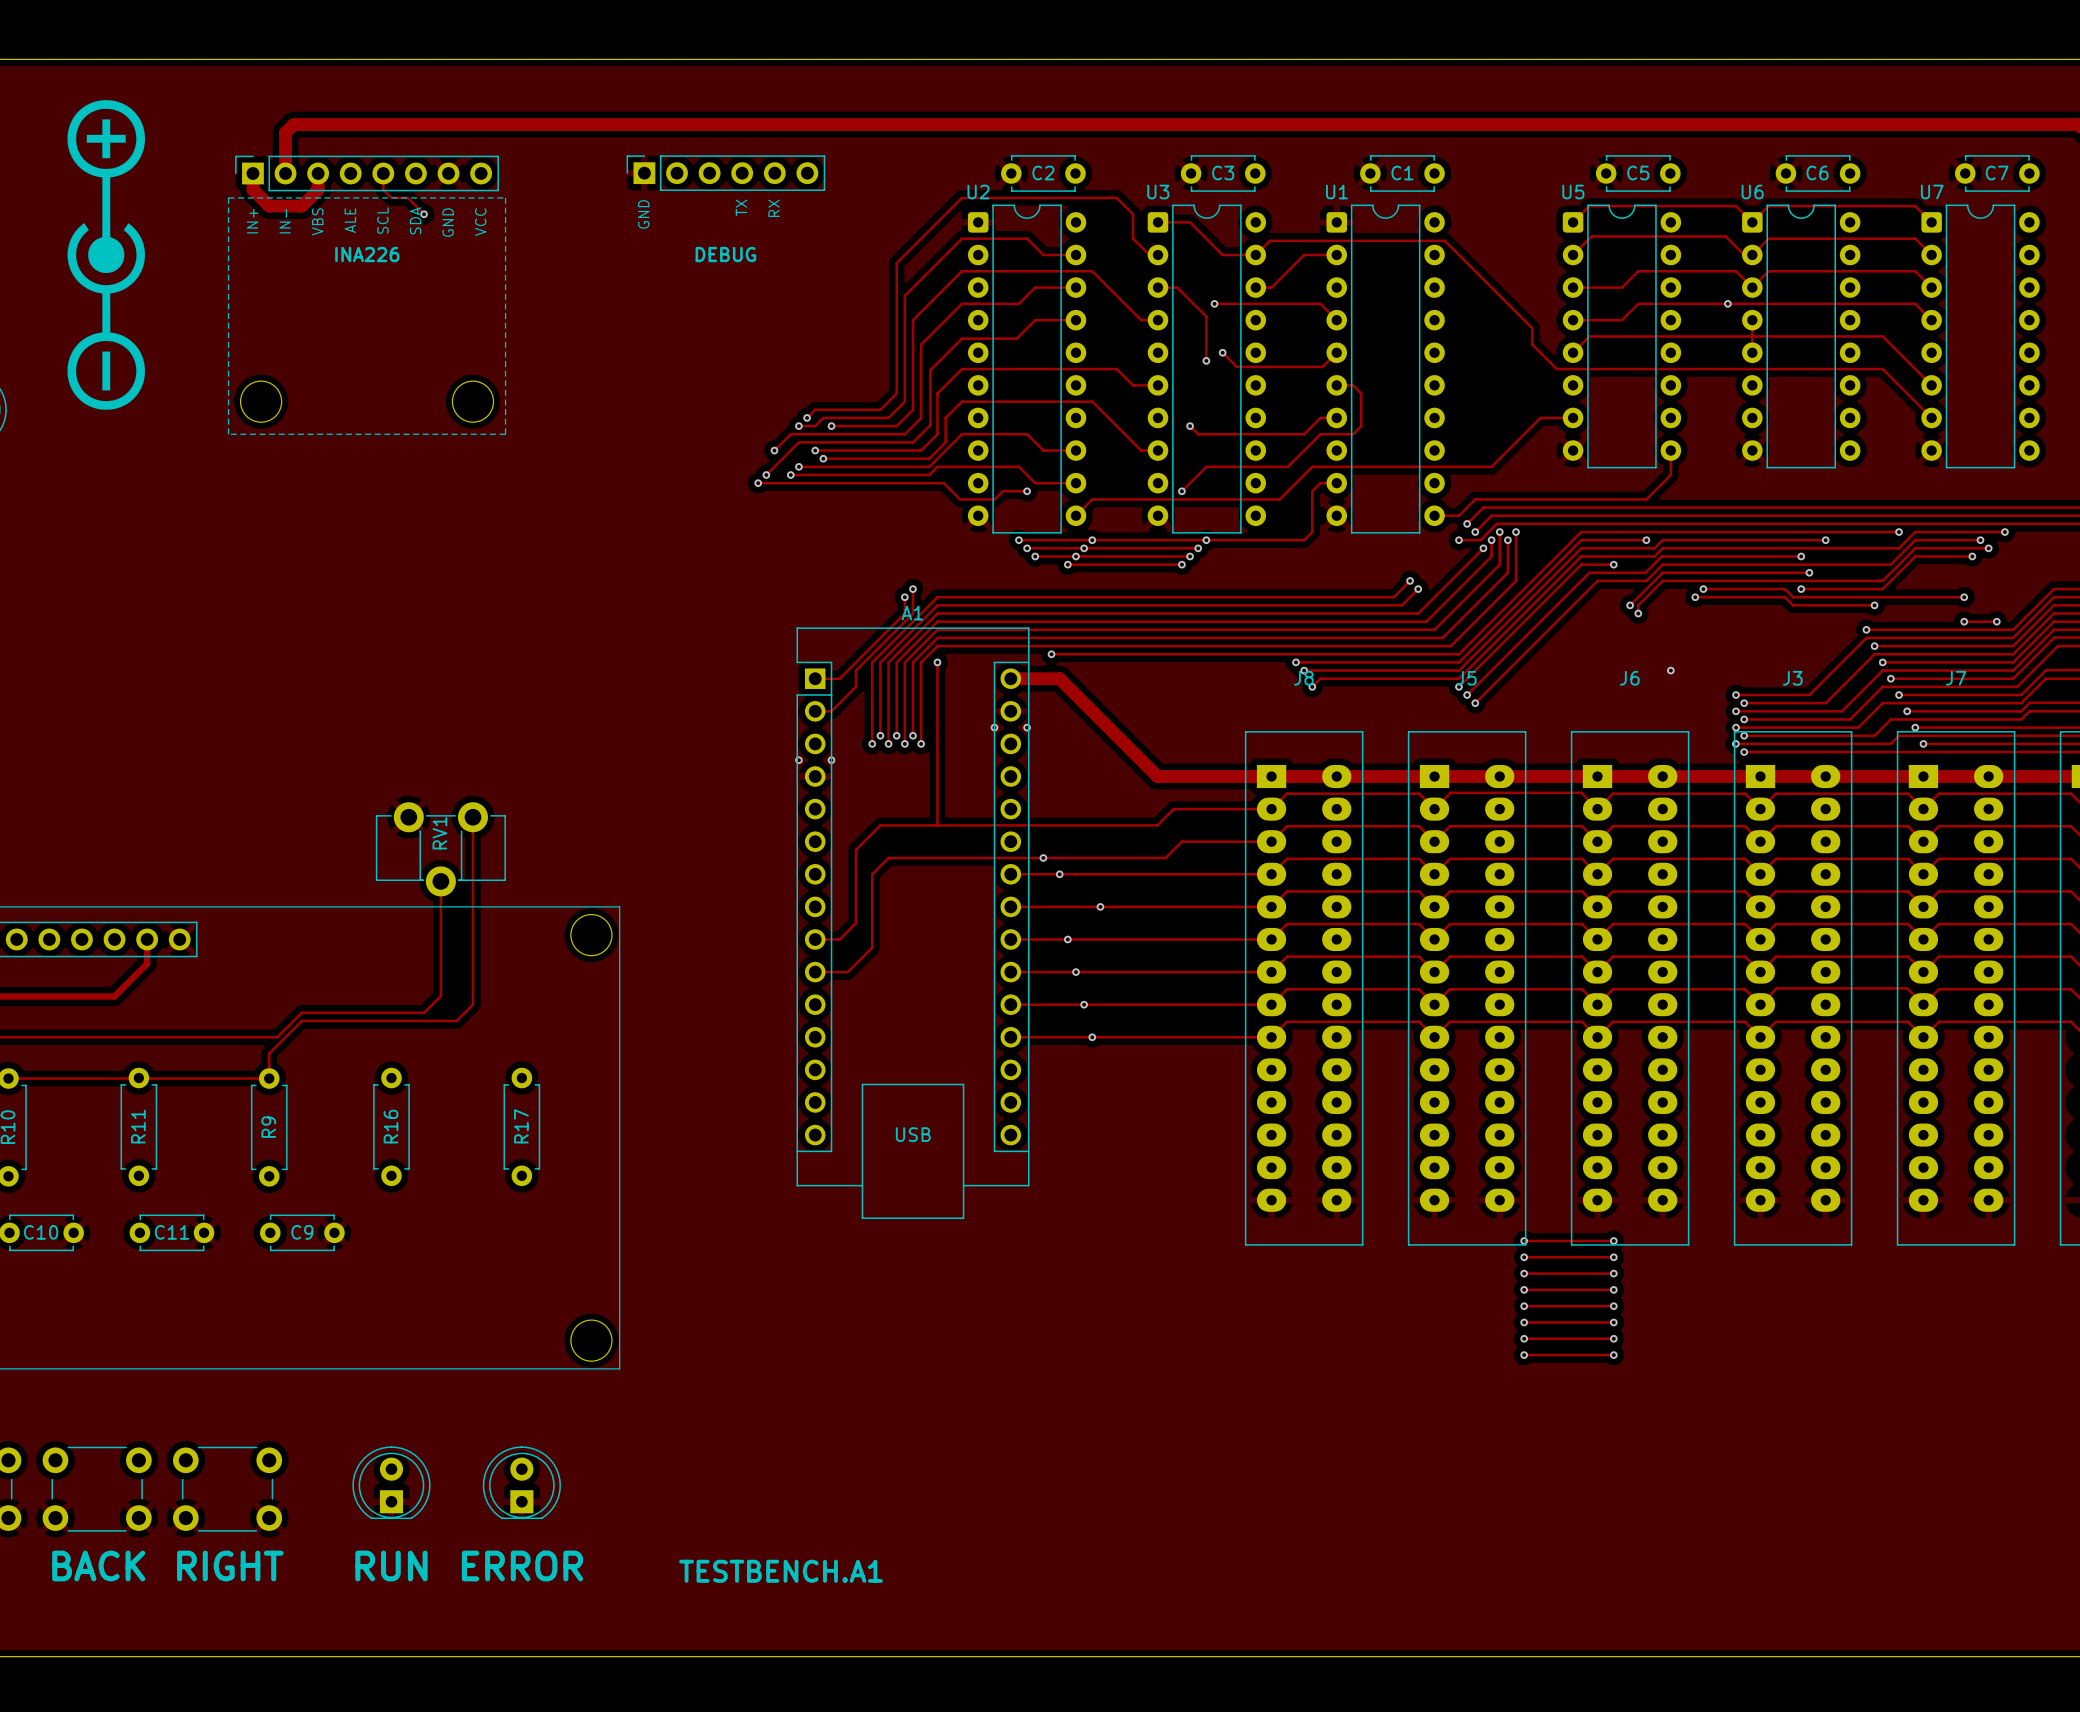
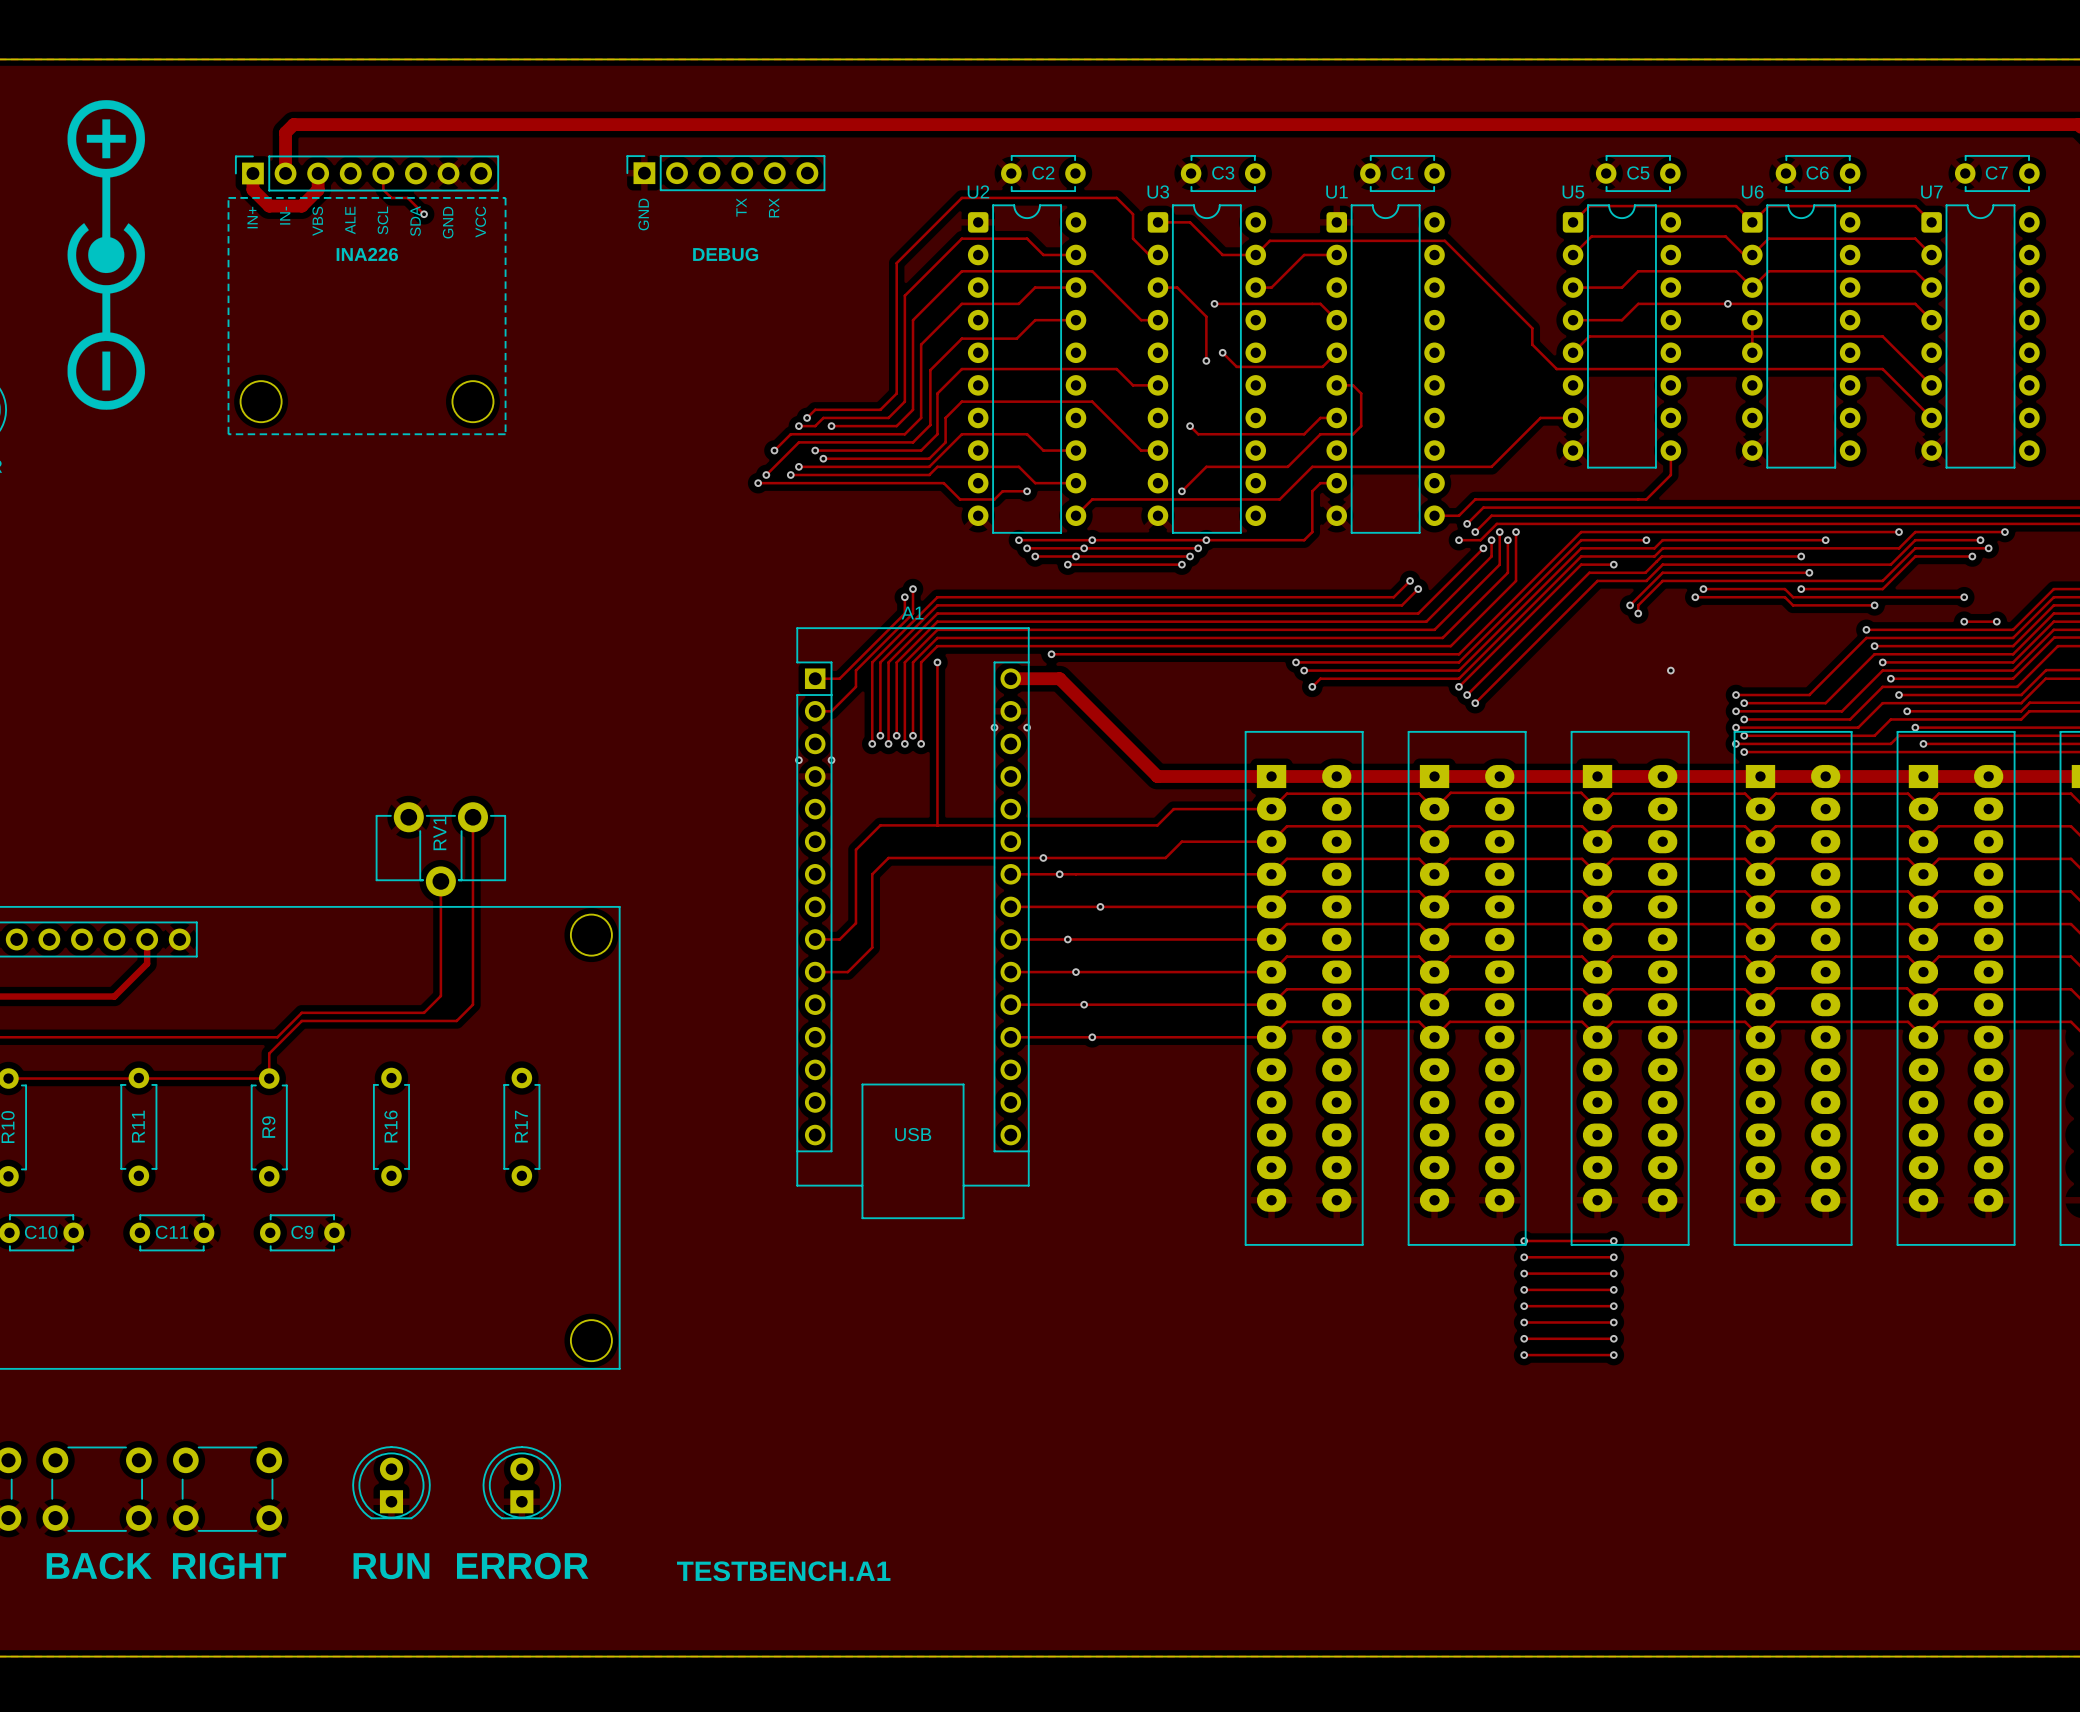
J8 name: J8 (1303, 678) -> none
J5 name: J5 (1466, 678) -> none
J6 name: J6 (1629, 678) -> none
J3 name: J3 (1792, 678) -> none
J7 name: J7 (1956, 678) -> none

